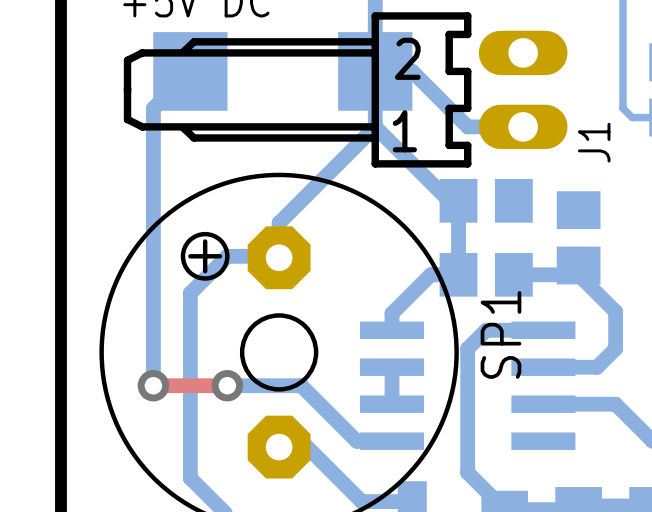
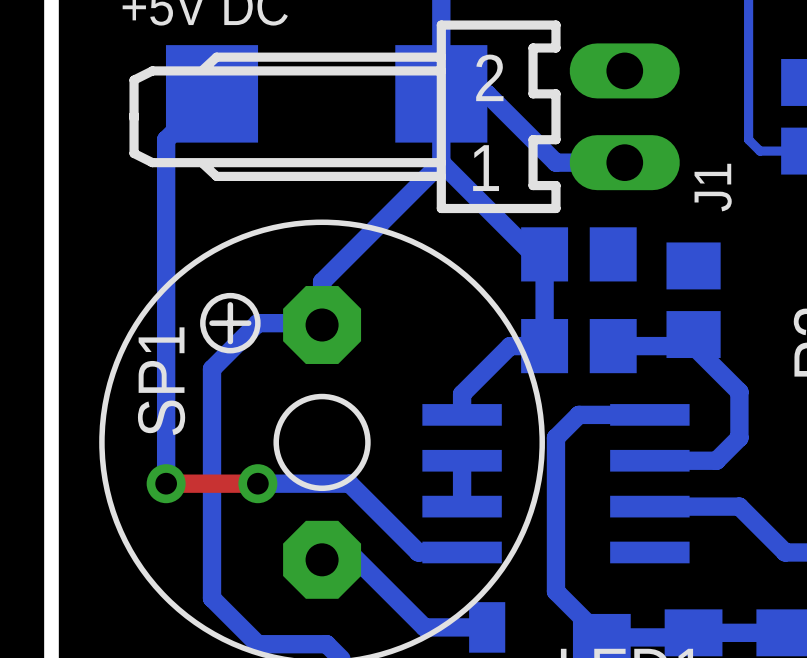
SP1 name position: SP1 (500, 334) -> SP1 (161, 381)

